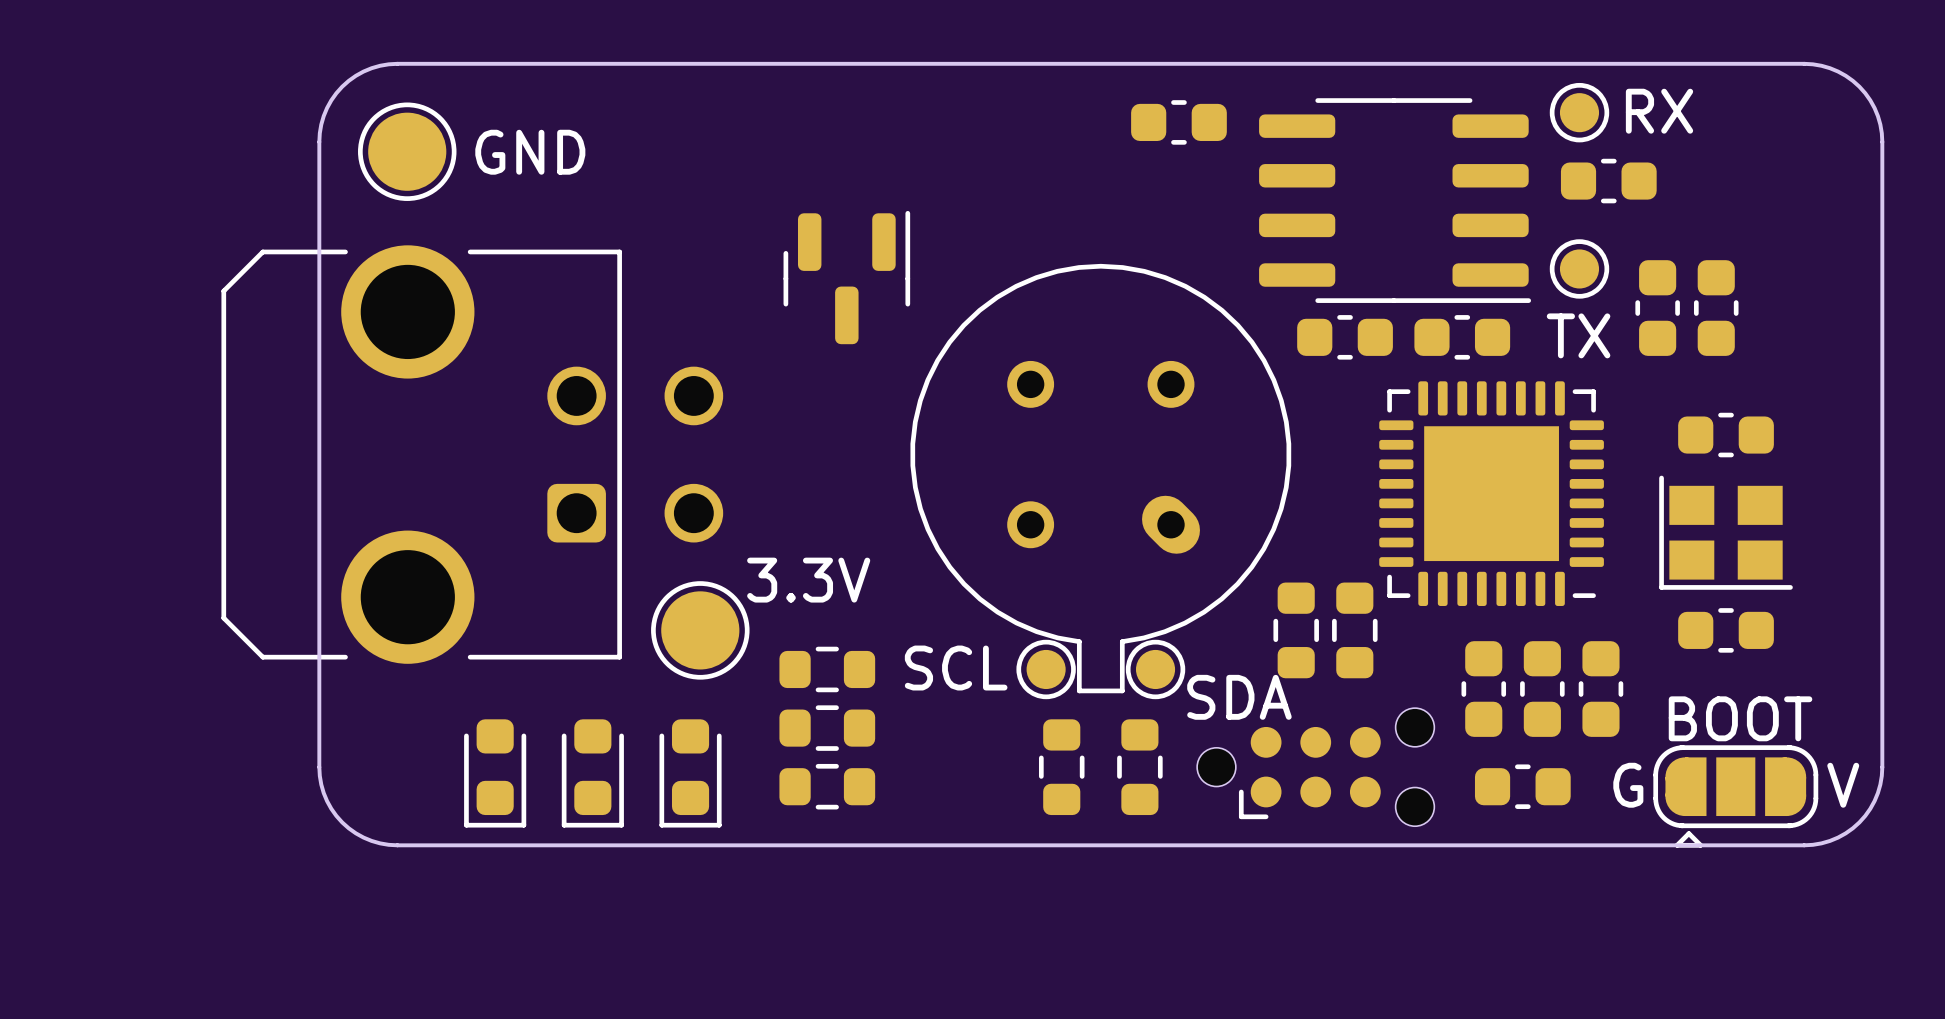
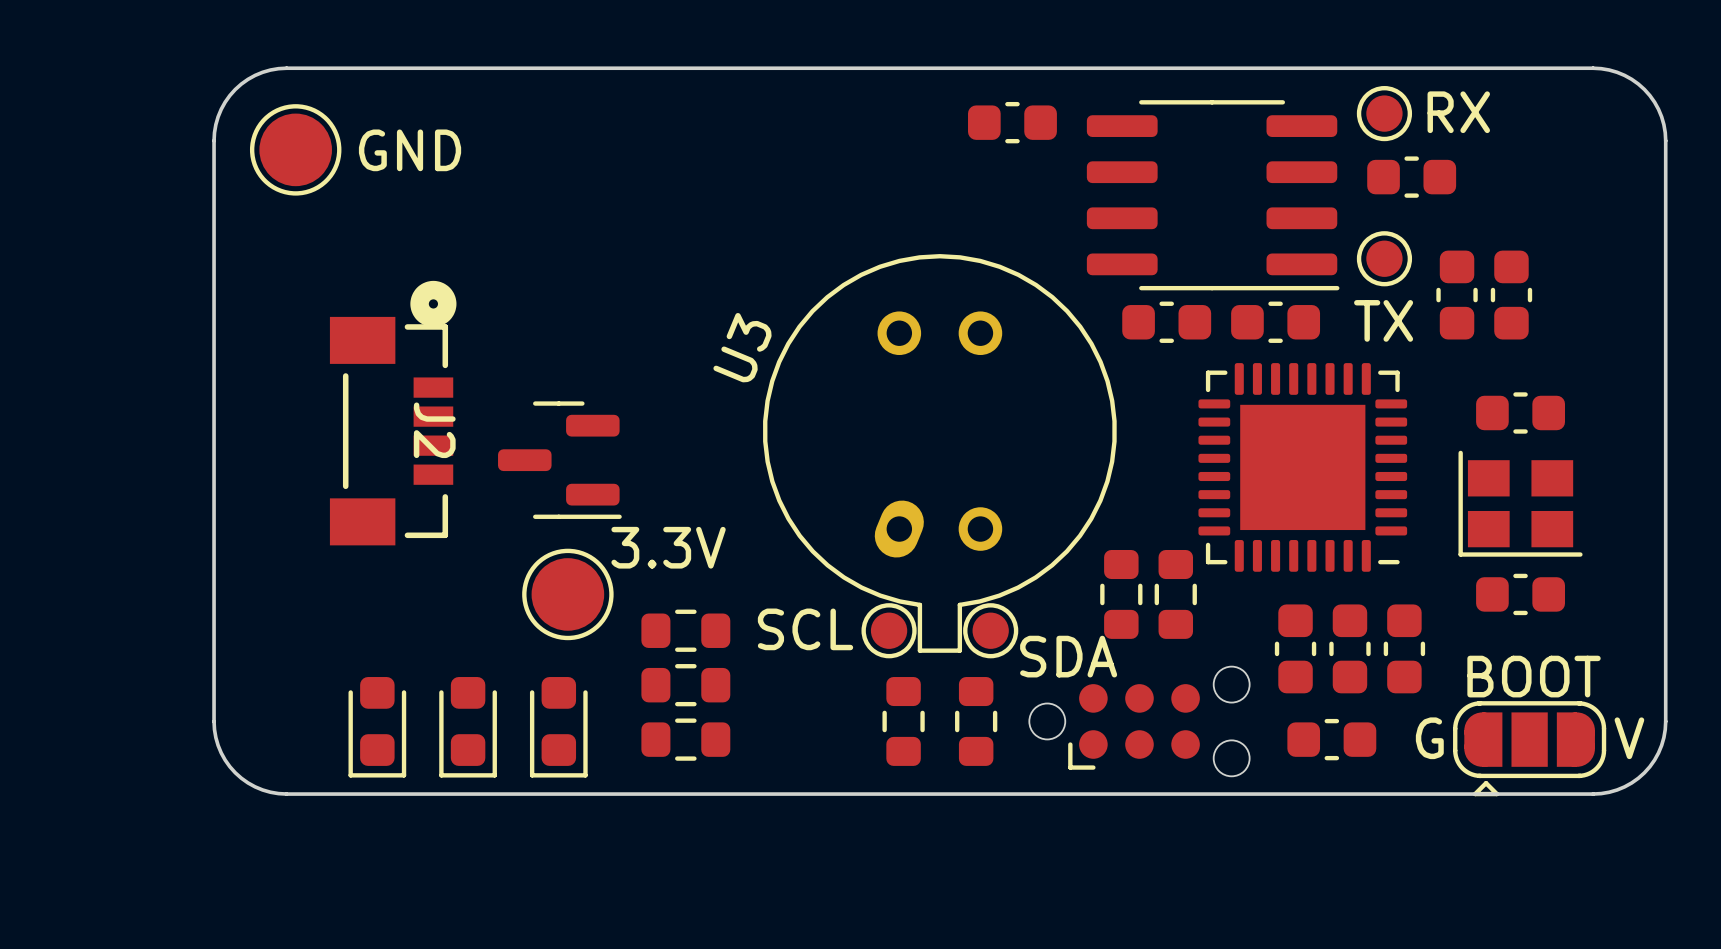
part rotation: 0° (846, 277) -> 90° clockwise (559, 460)
part position: (846, 277) -> (559, 460)
J2: none -> (393, 413)
part: (472, 454) -> none
part: (1100, 478) -> none
U3: none -> (939, 453)

